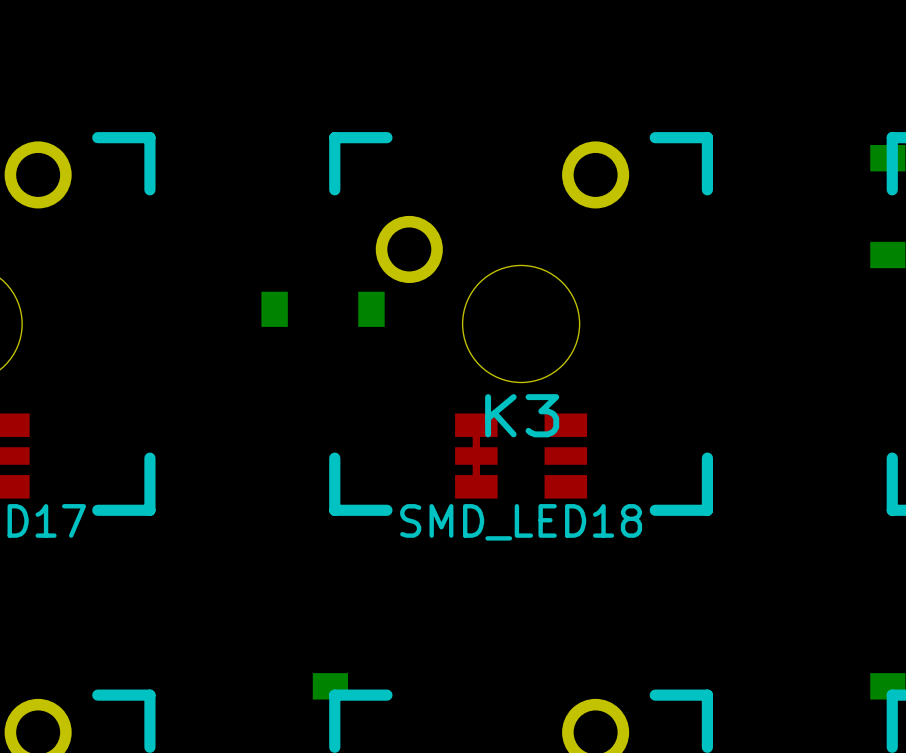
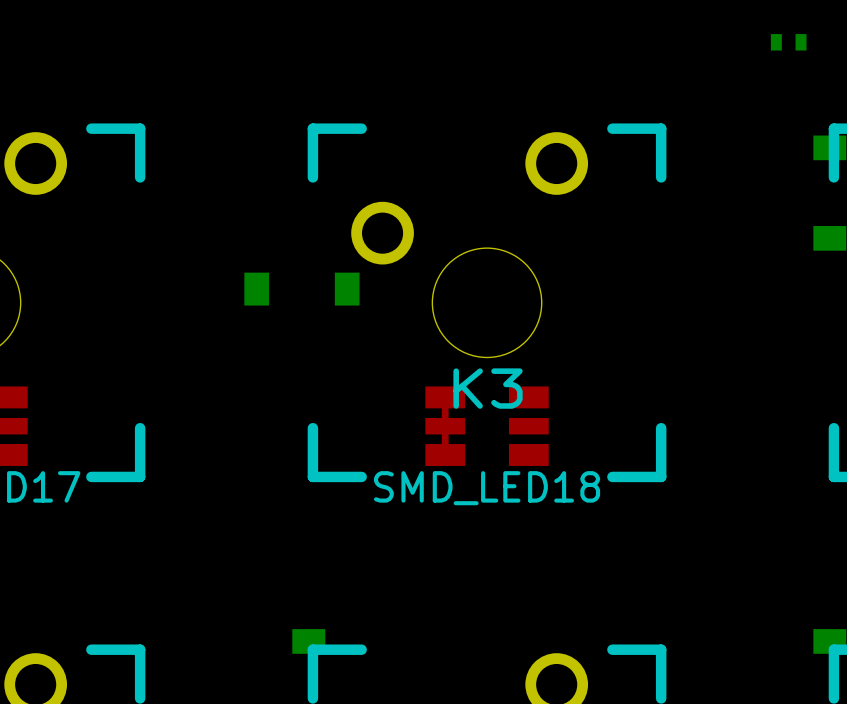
part: none -> (788, 42)

